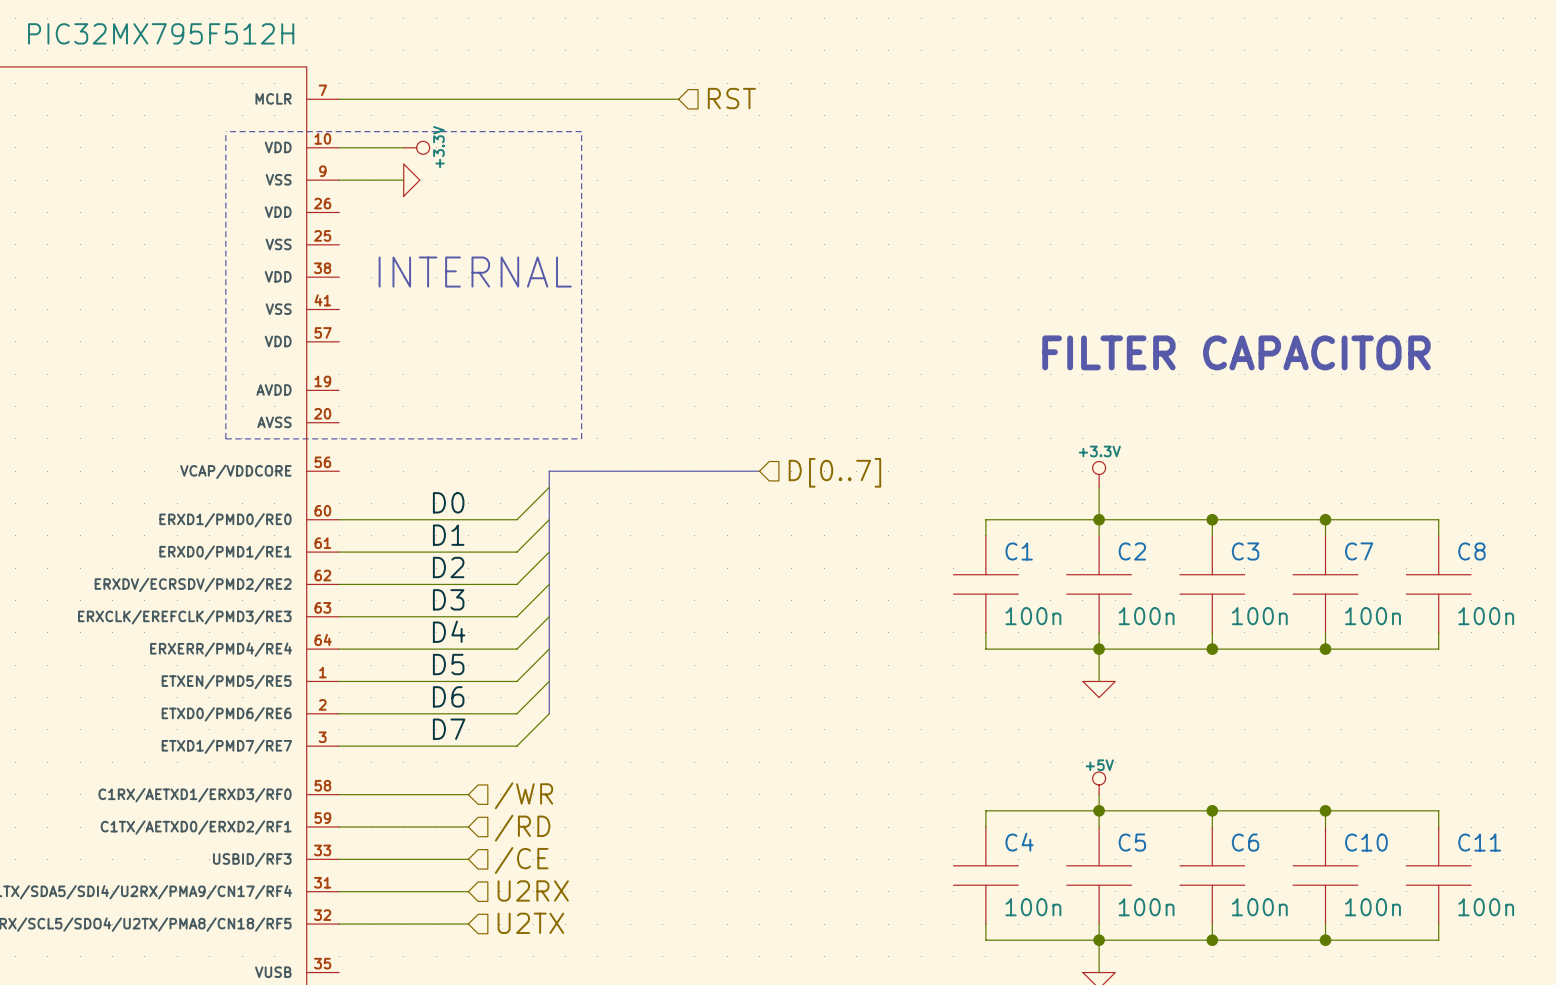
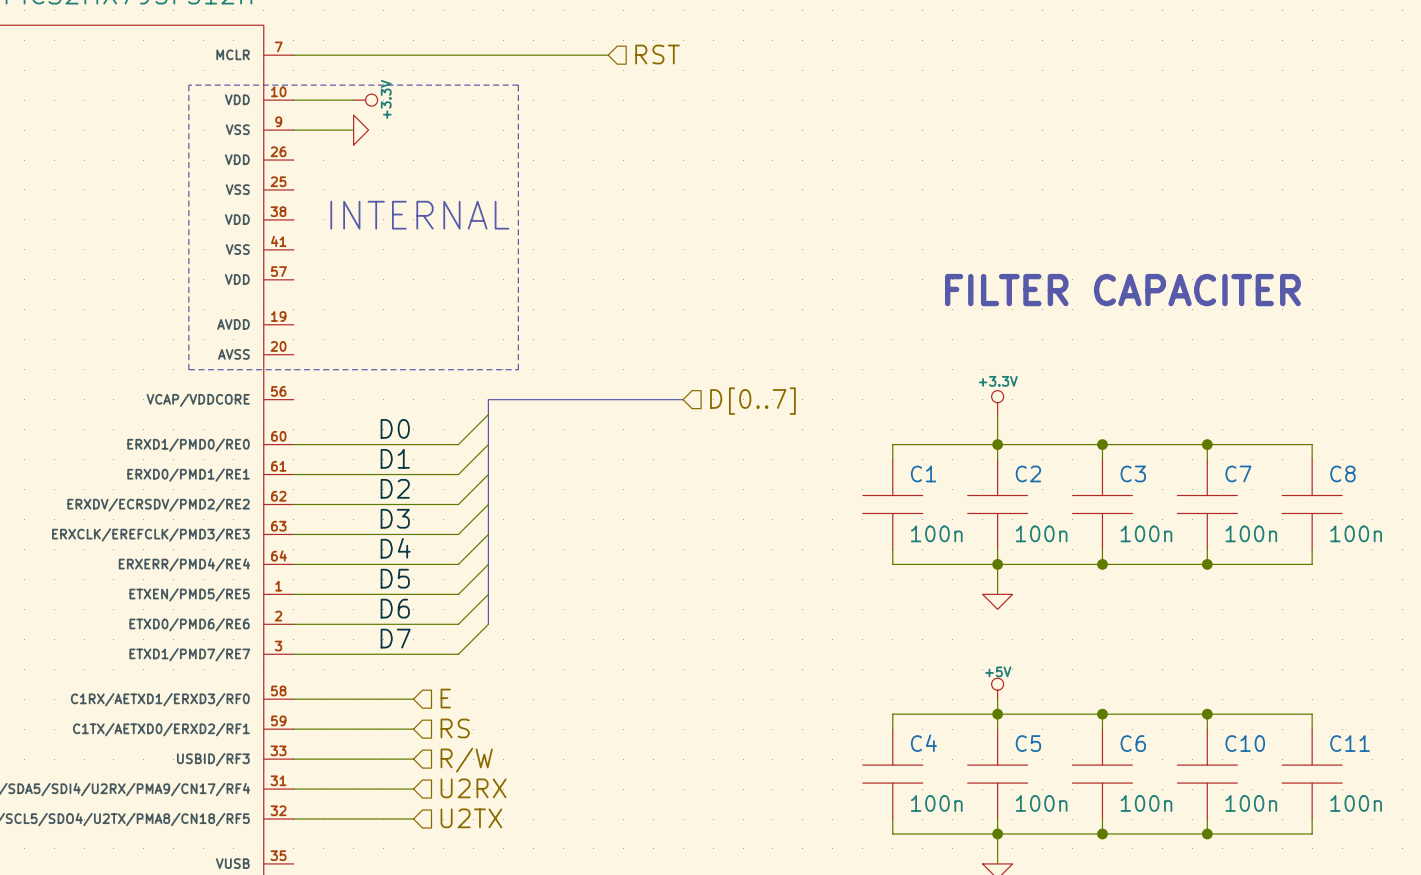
text: FILTER CAPACITOR (1236, 352) -> FILTER CAPACITER (1122, 290)
hierarchical label: /WR (523, 795) -> E (445, 698)
hierarchical label: /RD (522, 828) -> RS (455, 728)
hierarchical label: /CE (521, 860) -> R/W (466, 760)

